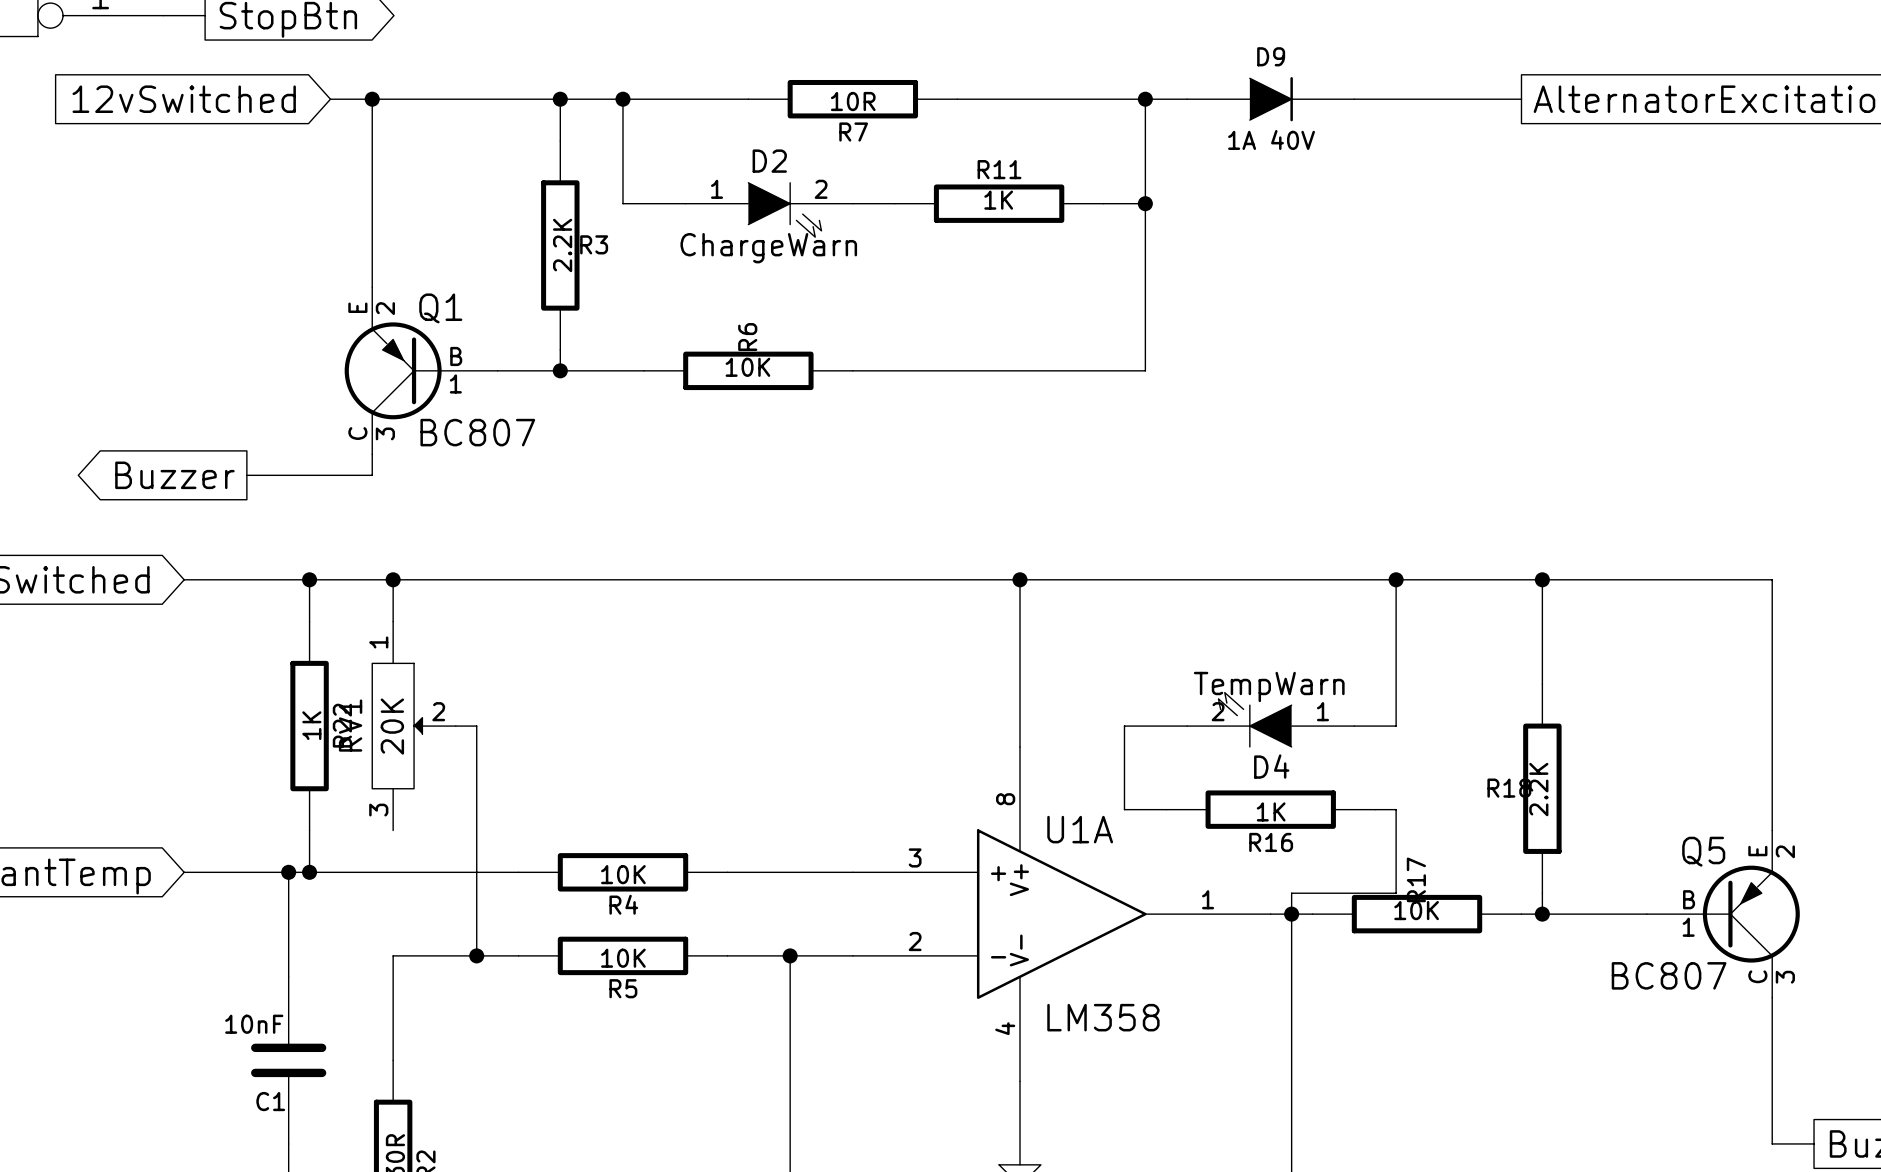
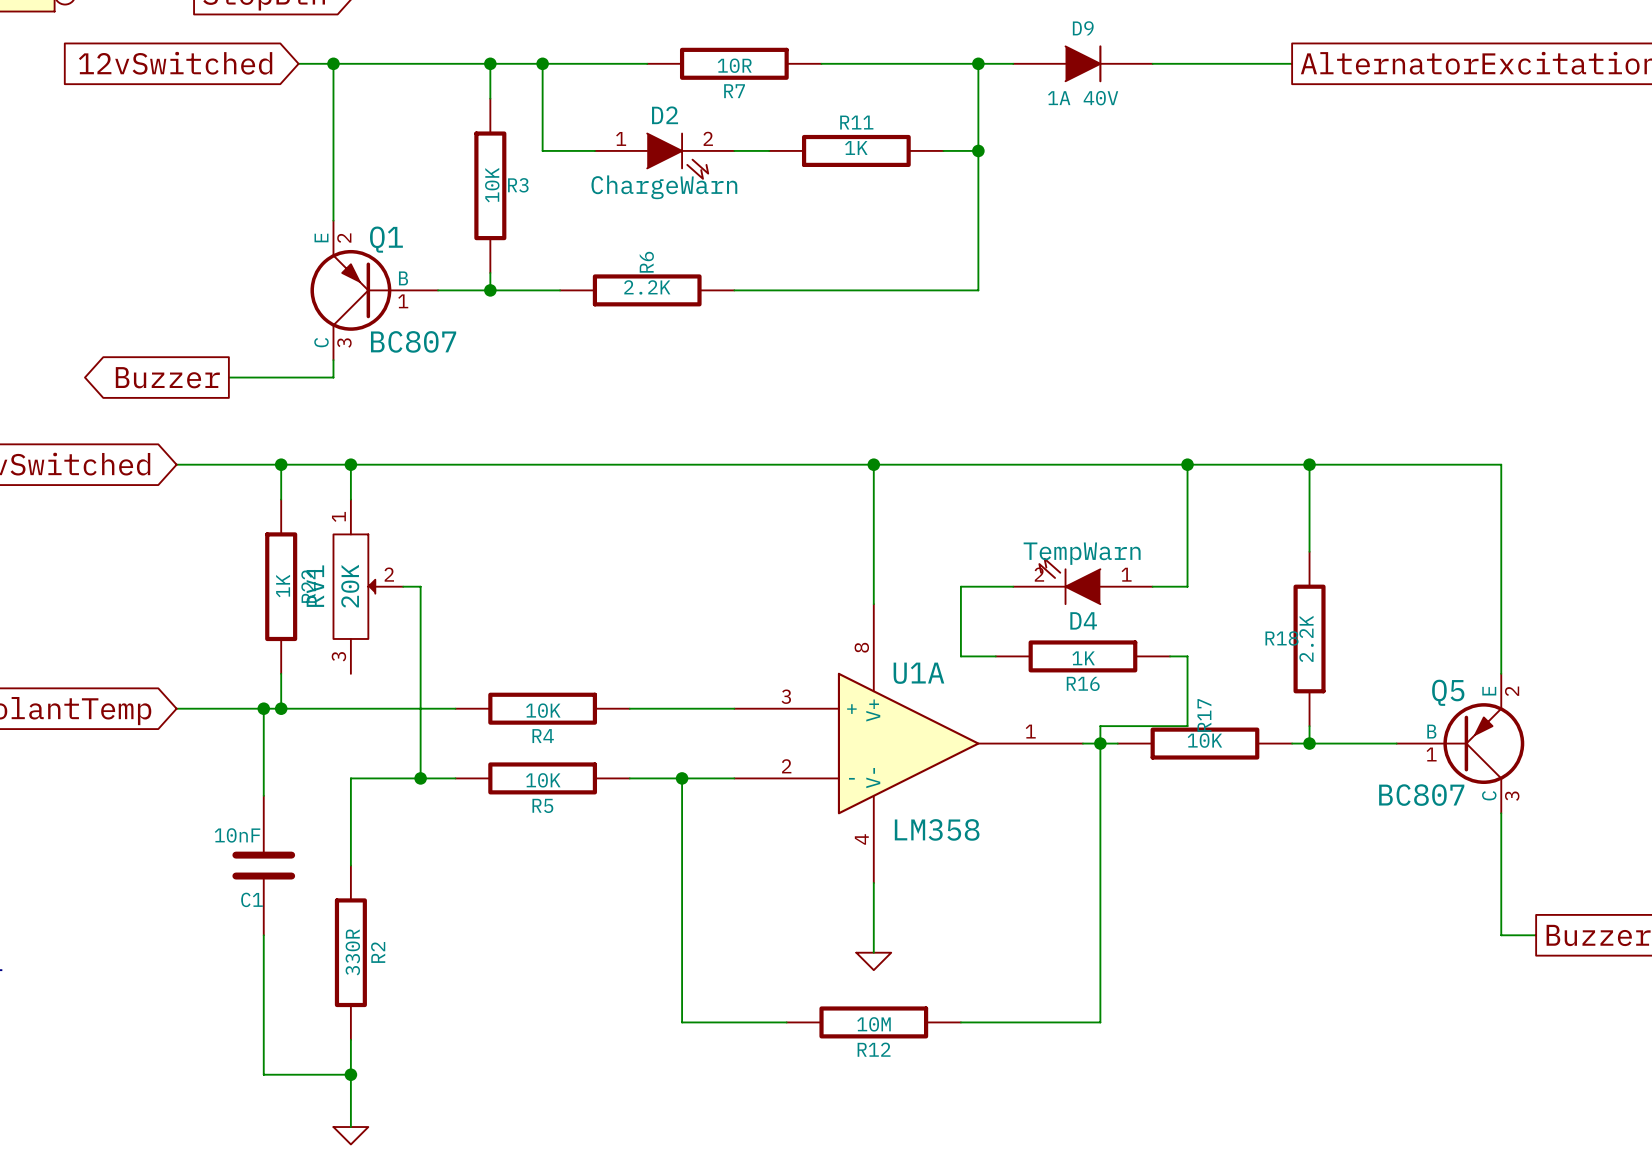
R3 value: 2.2K (562, 245) -> 10K (492, 185)
R6 value: 10K (747, 367) -> 2.2K (647, 287)

